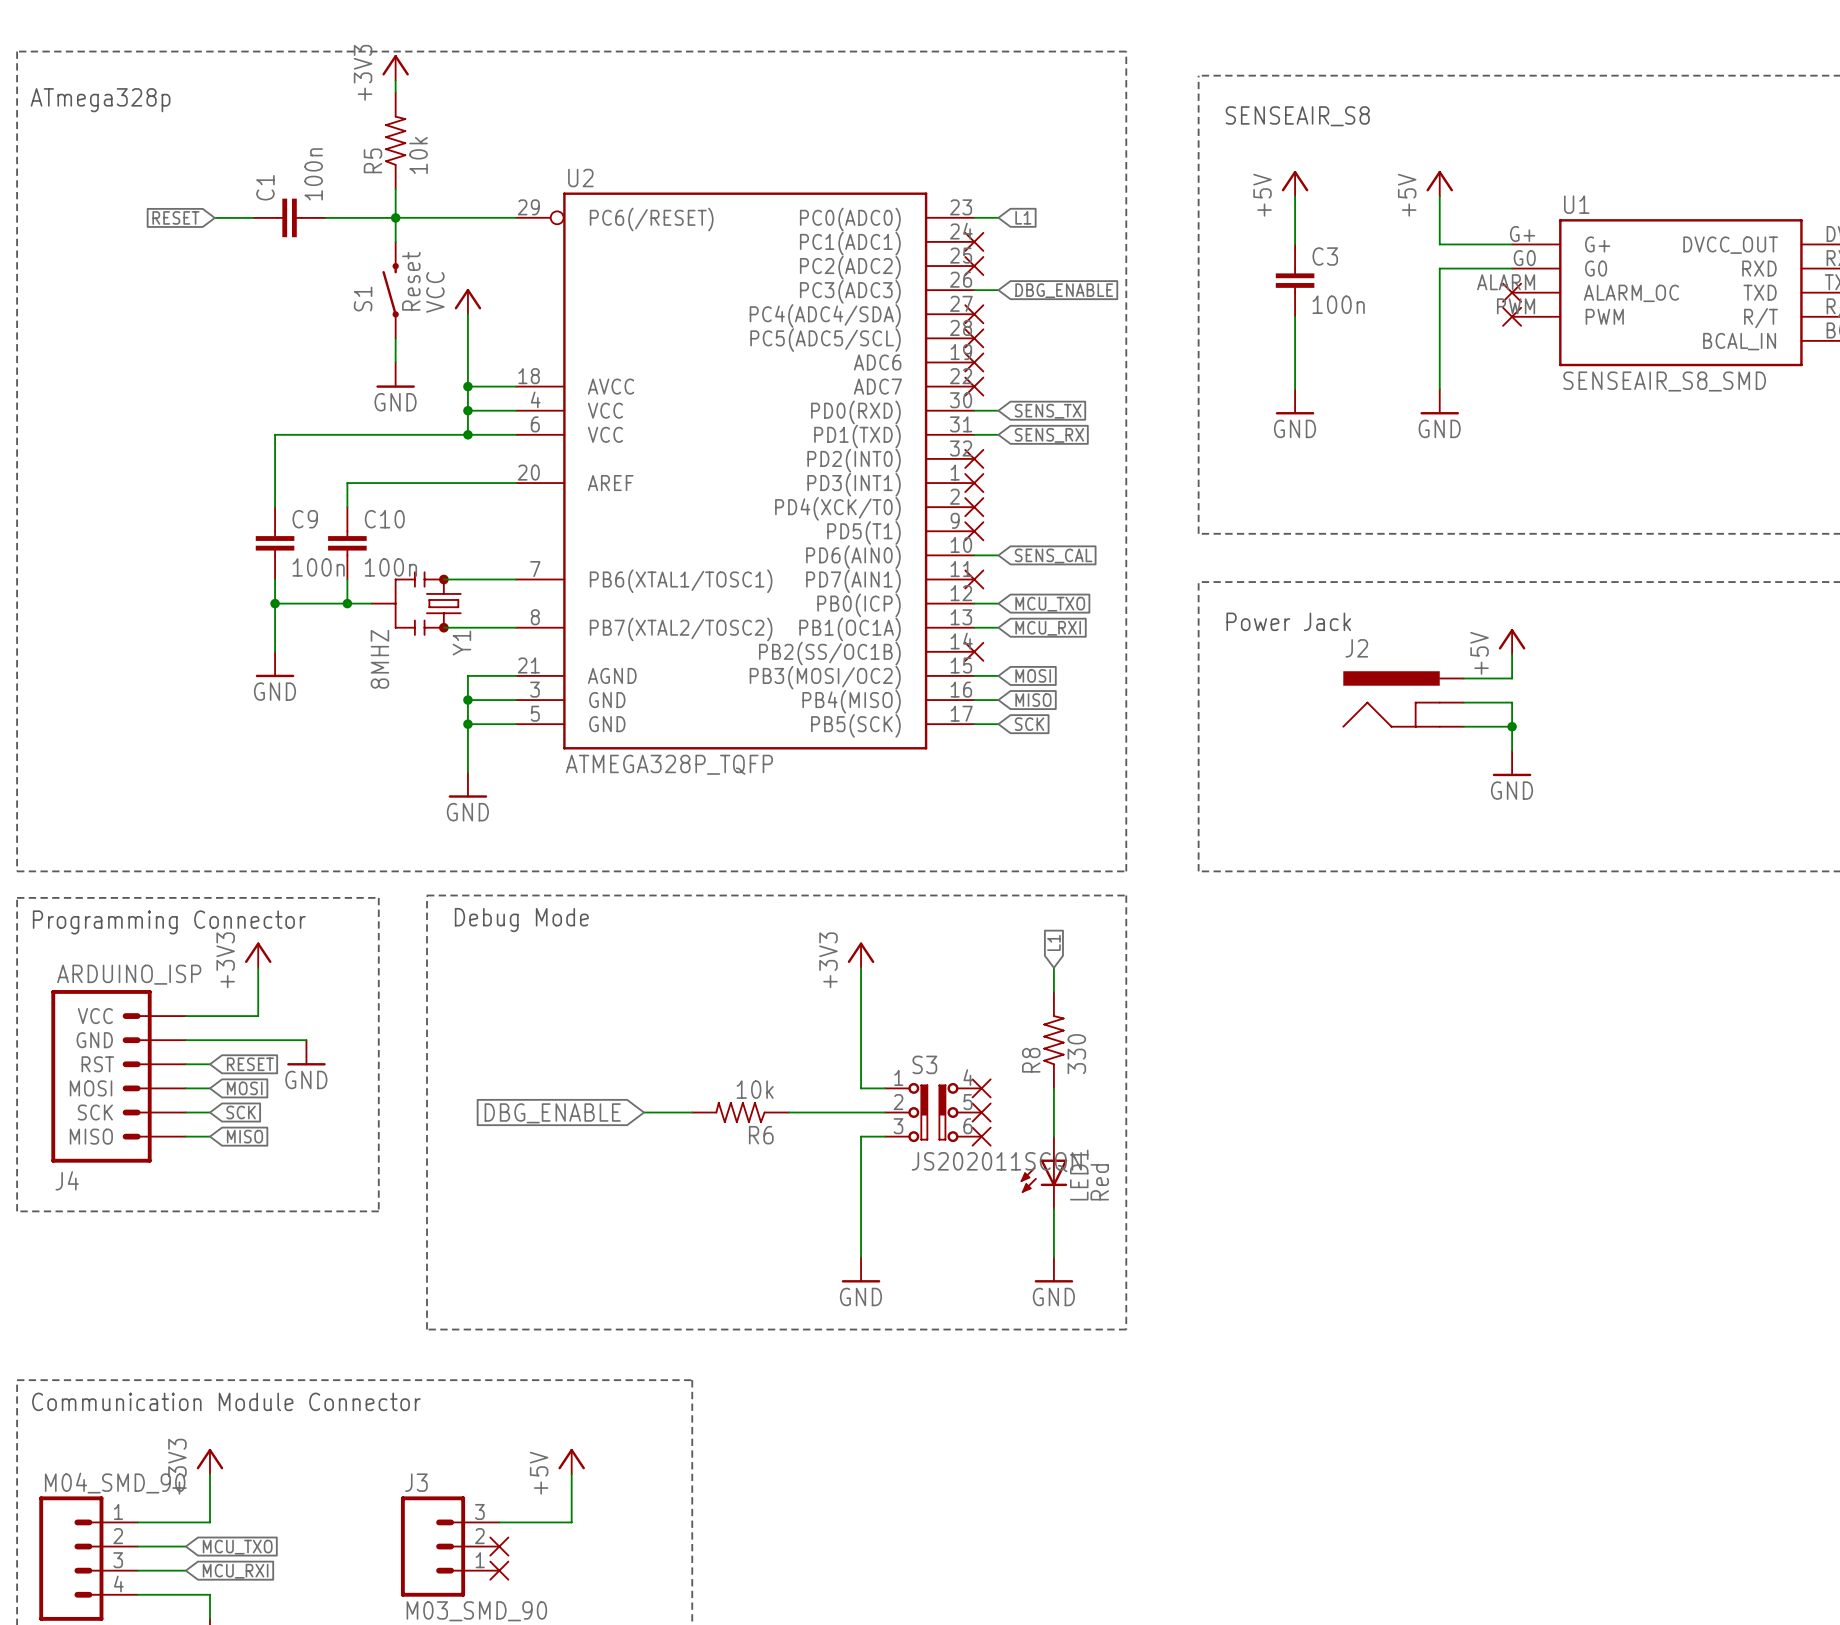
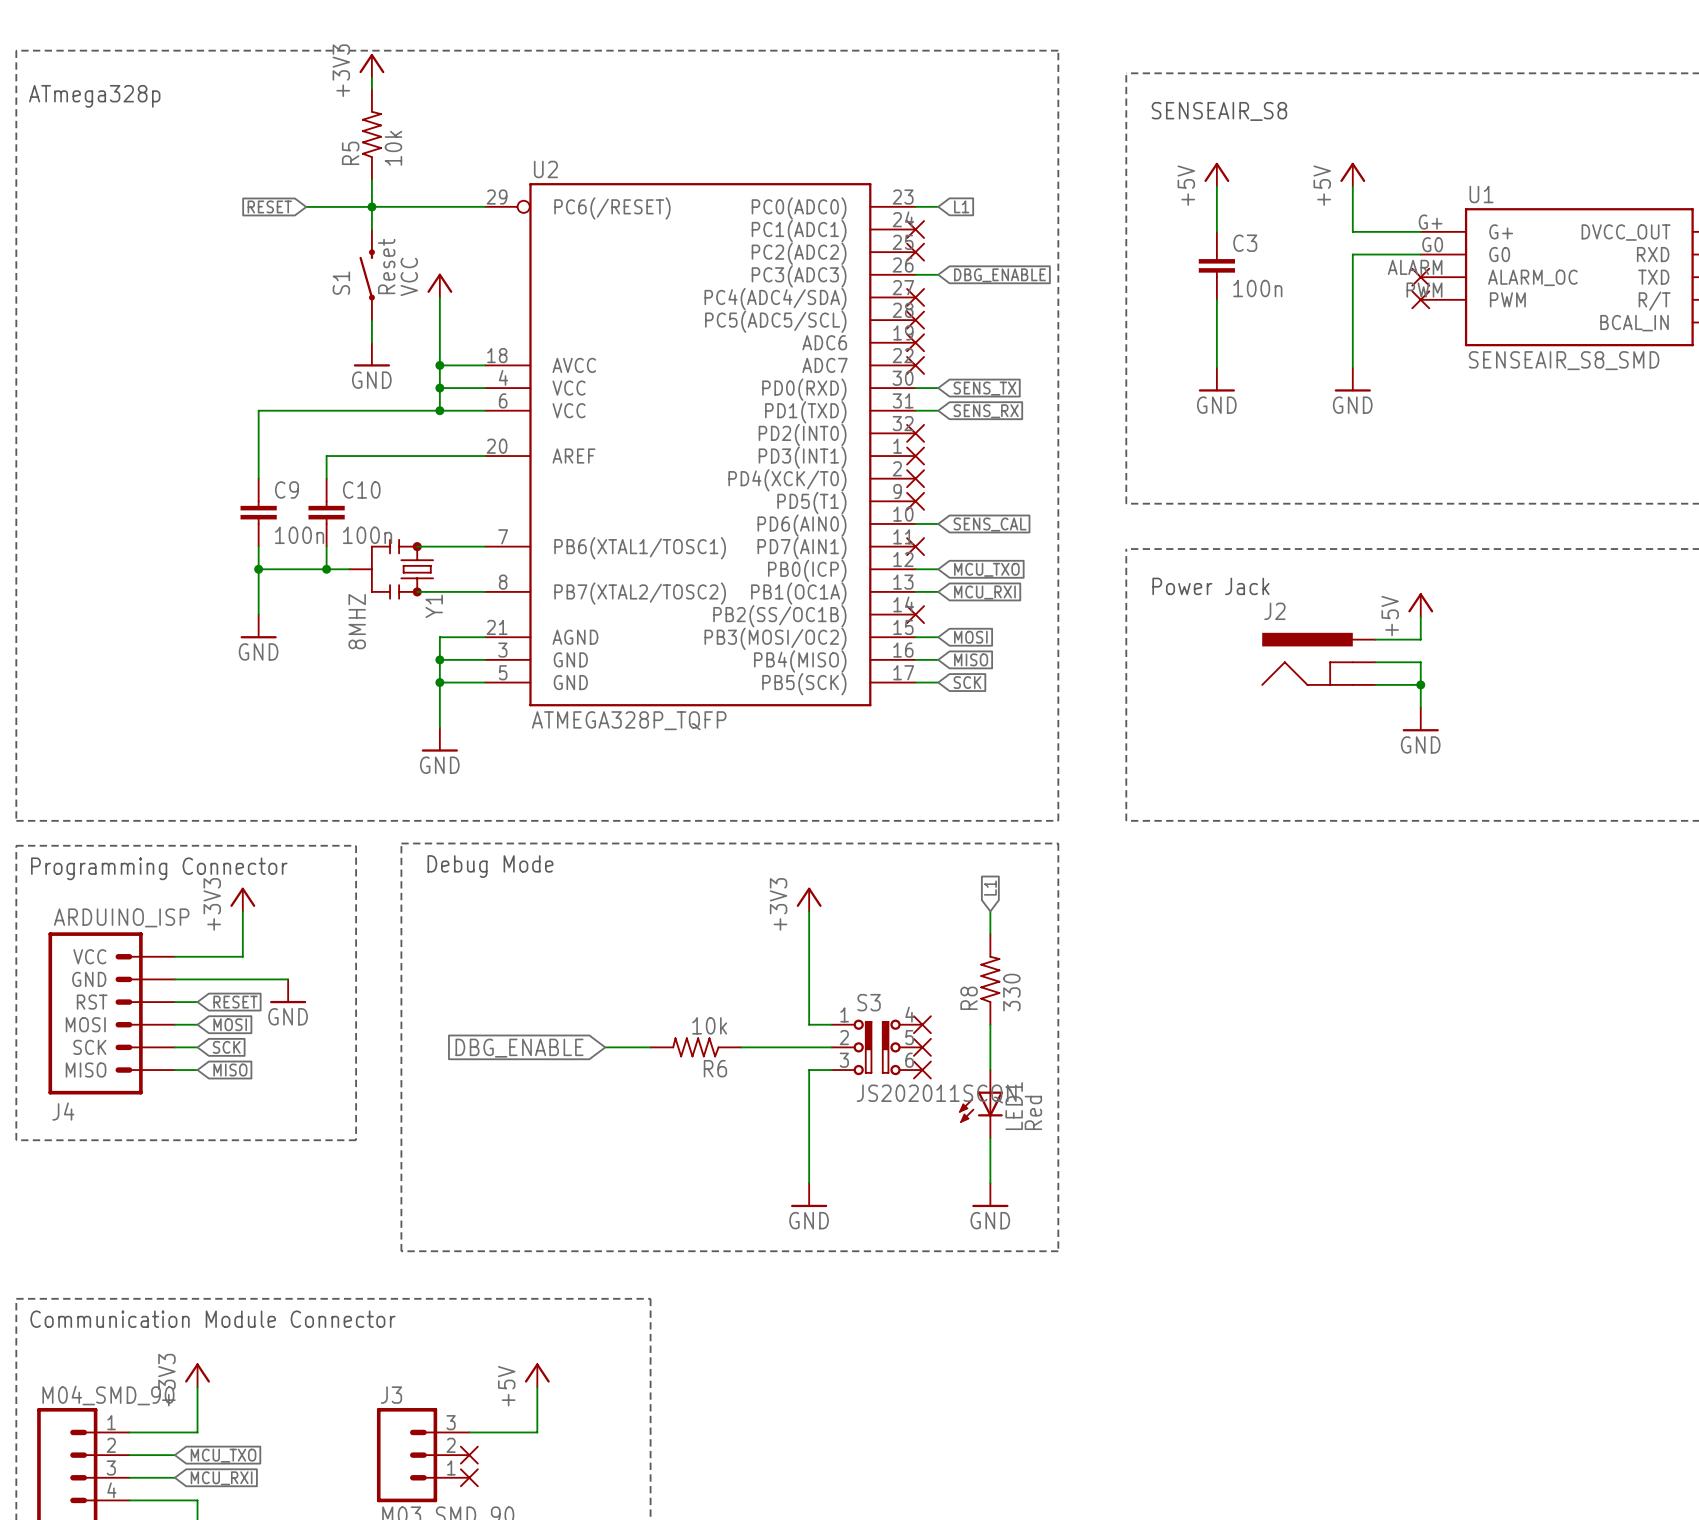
global label position: RESET (175, 217) -> RESET (269, 206)
wire: (214, 217) (253, 217) -> none
C1: 100n (289, 217) -> none

